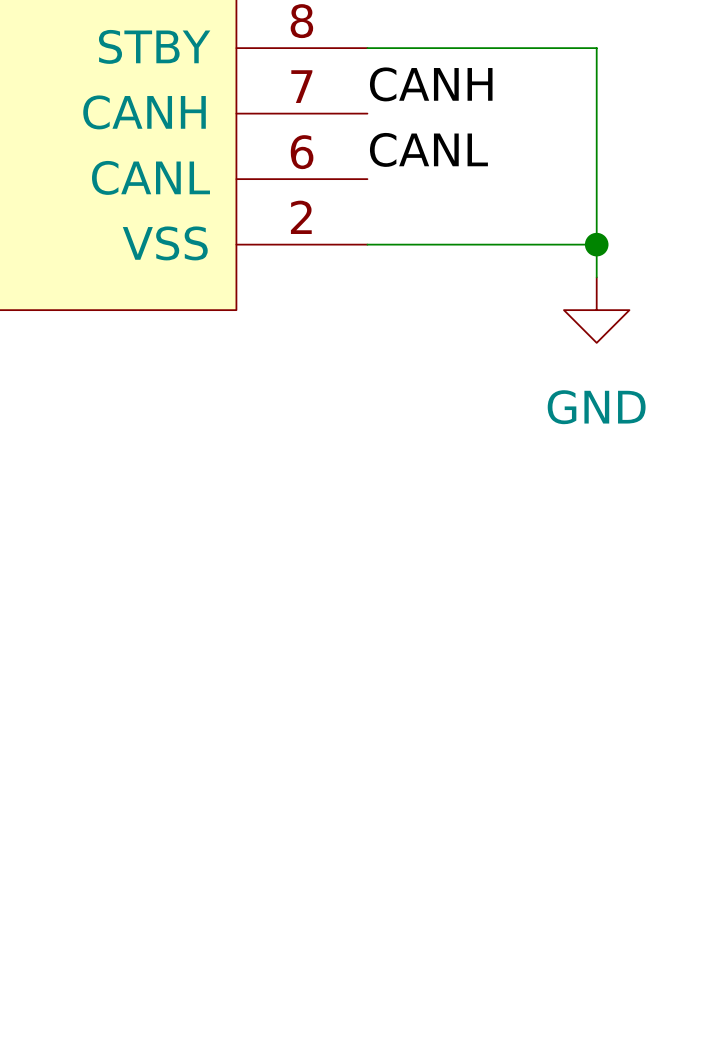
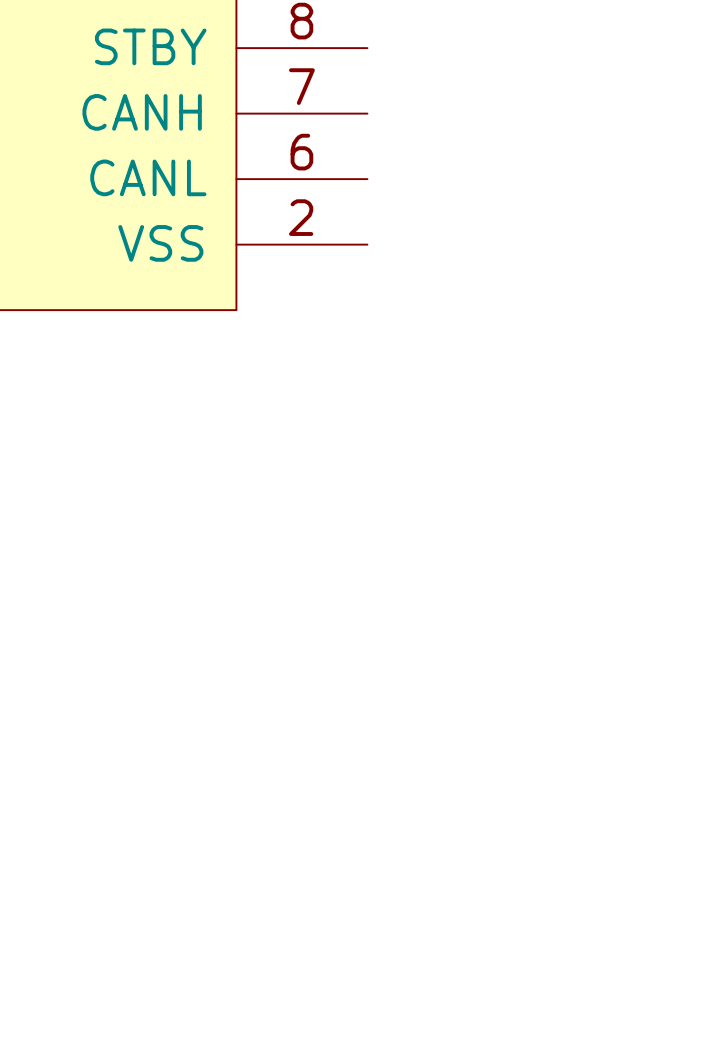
wire: (367, 48) (596, 48) (596, 277) -> none
label: CANH (431, 84) -> none
label: CANL (428, 149) -> none
wire: (367, 244) (596, 244) -> none
junction: (596, 244) -> none
power symbol: GND (596, 310) -> none

